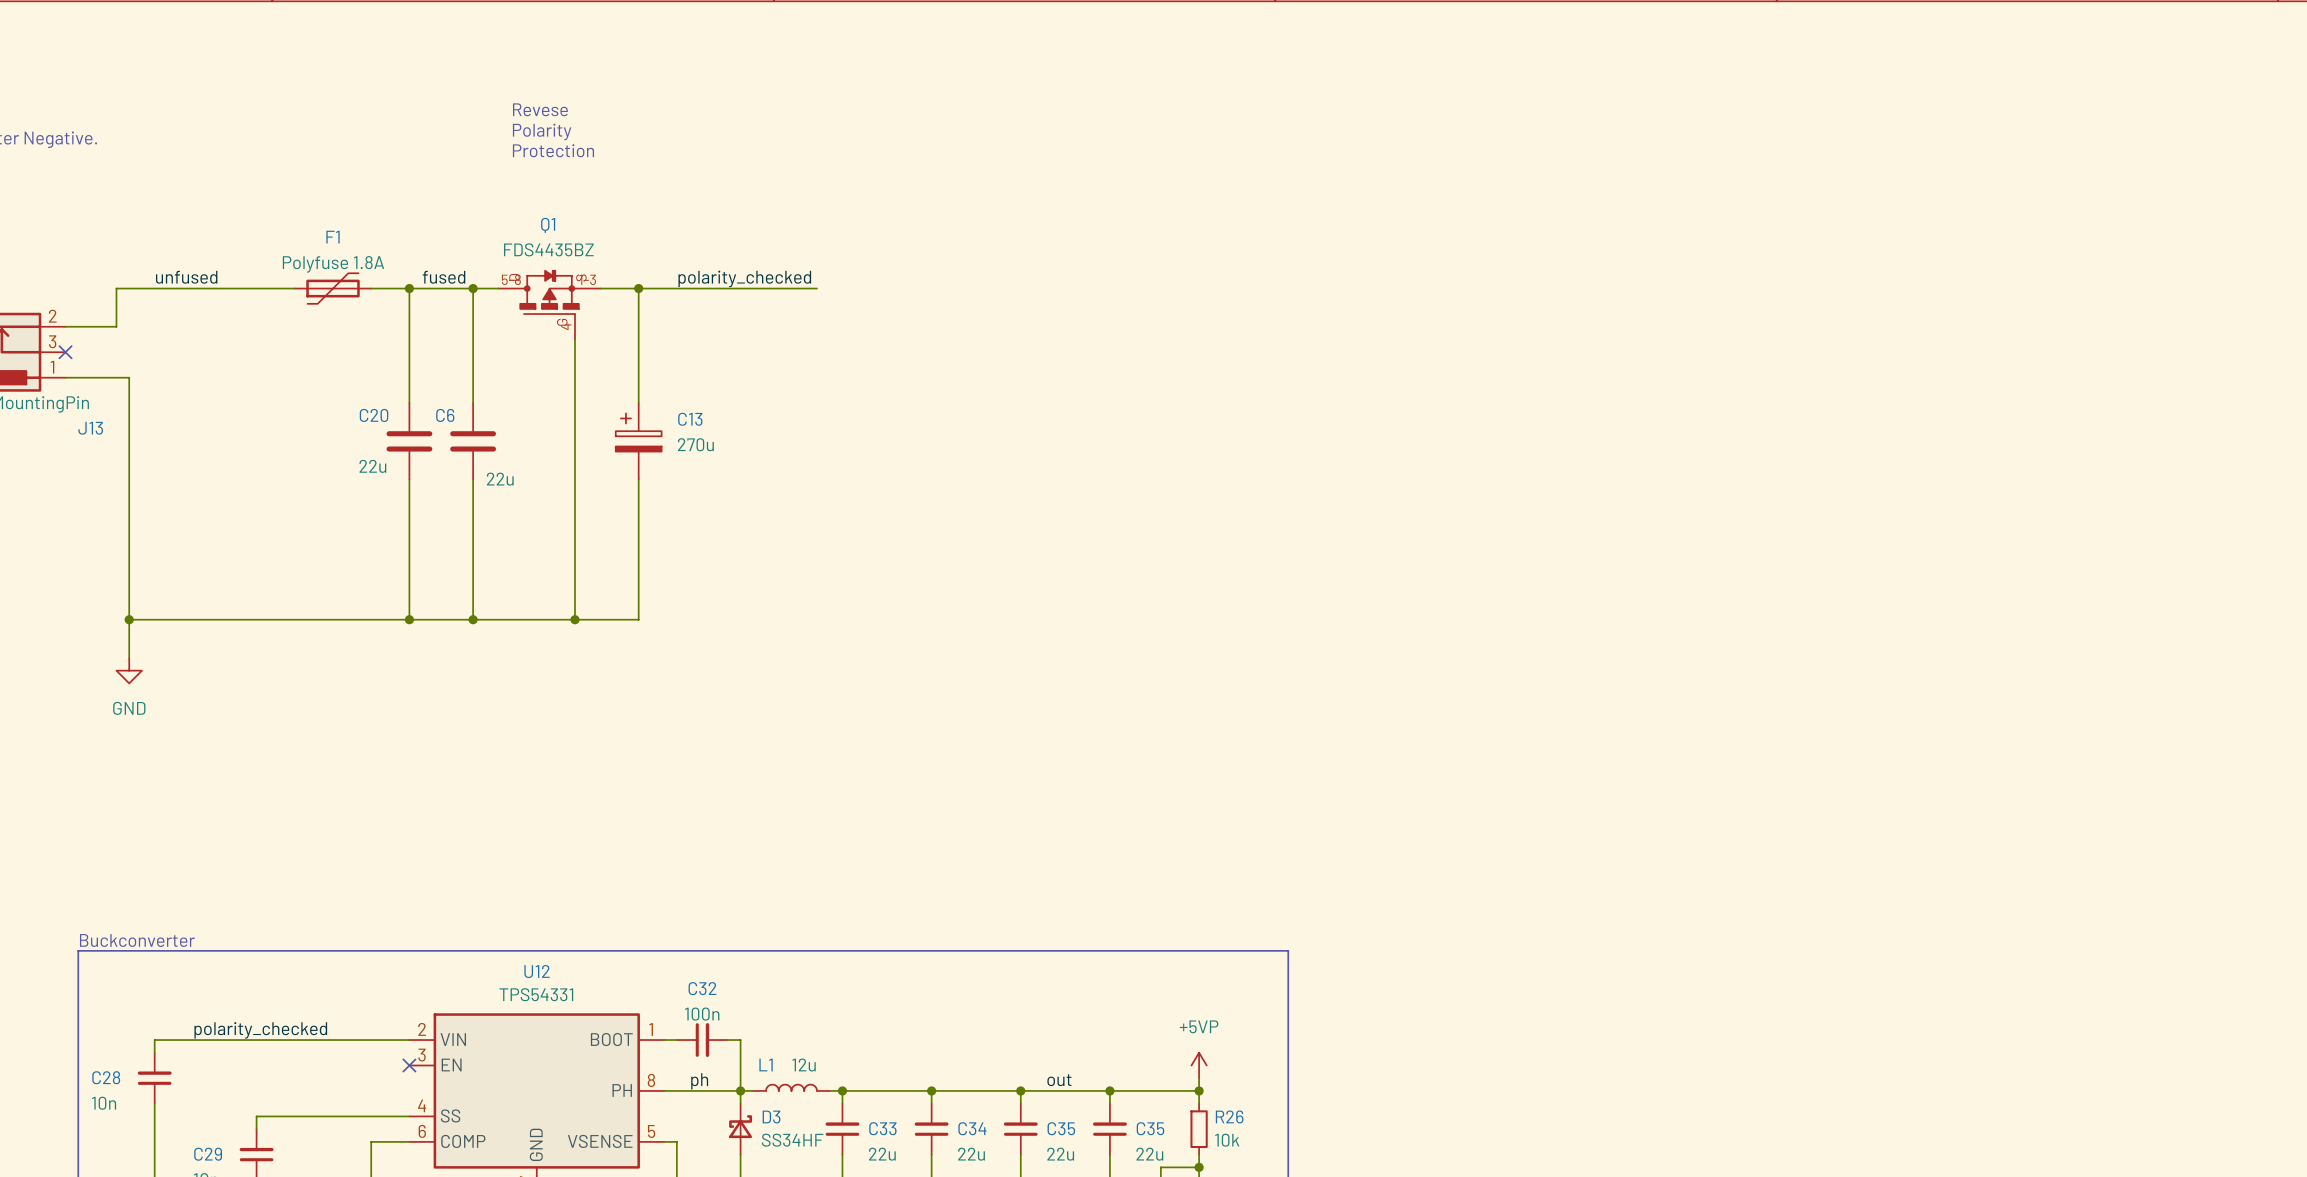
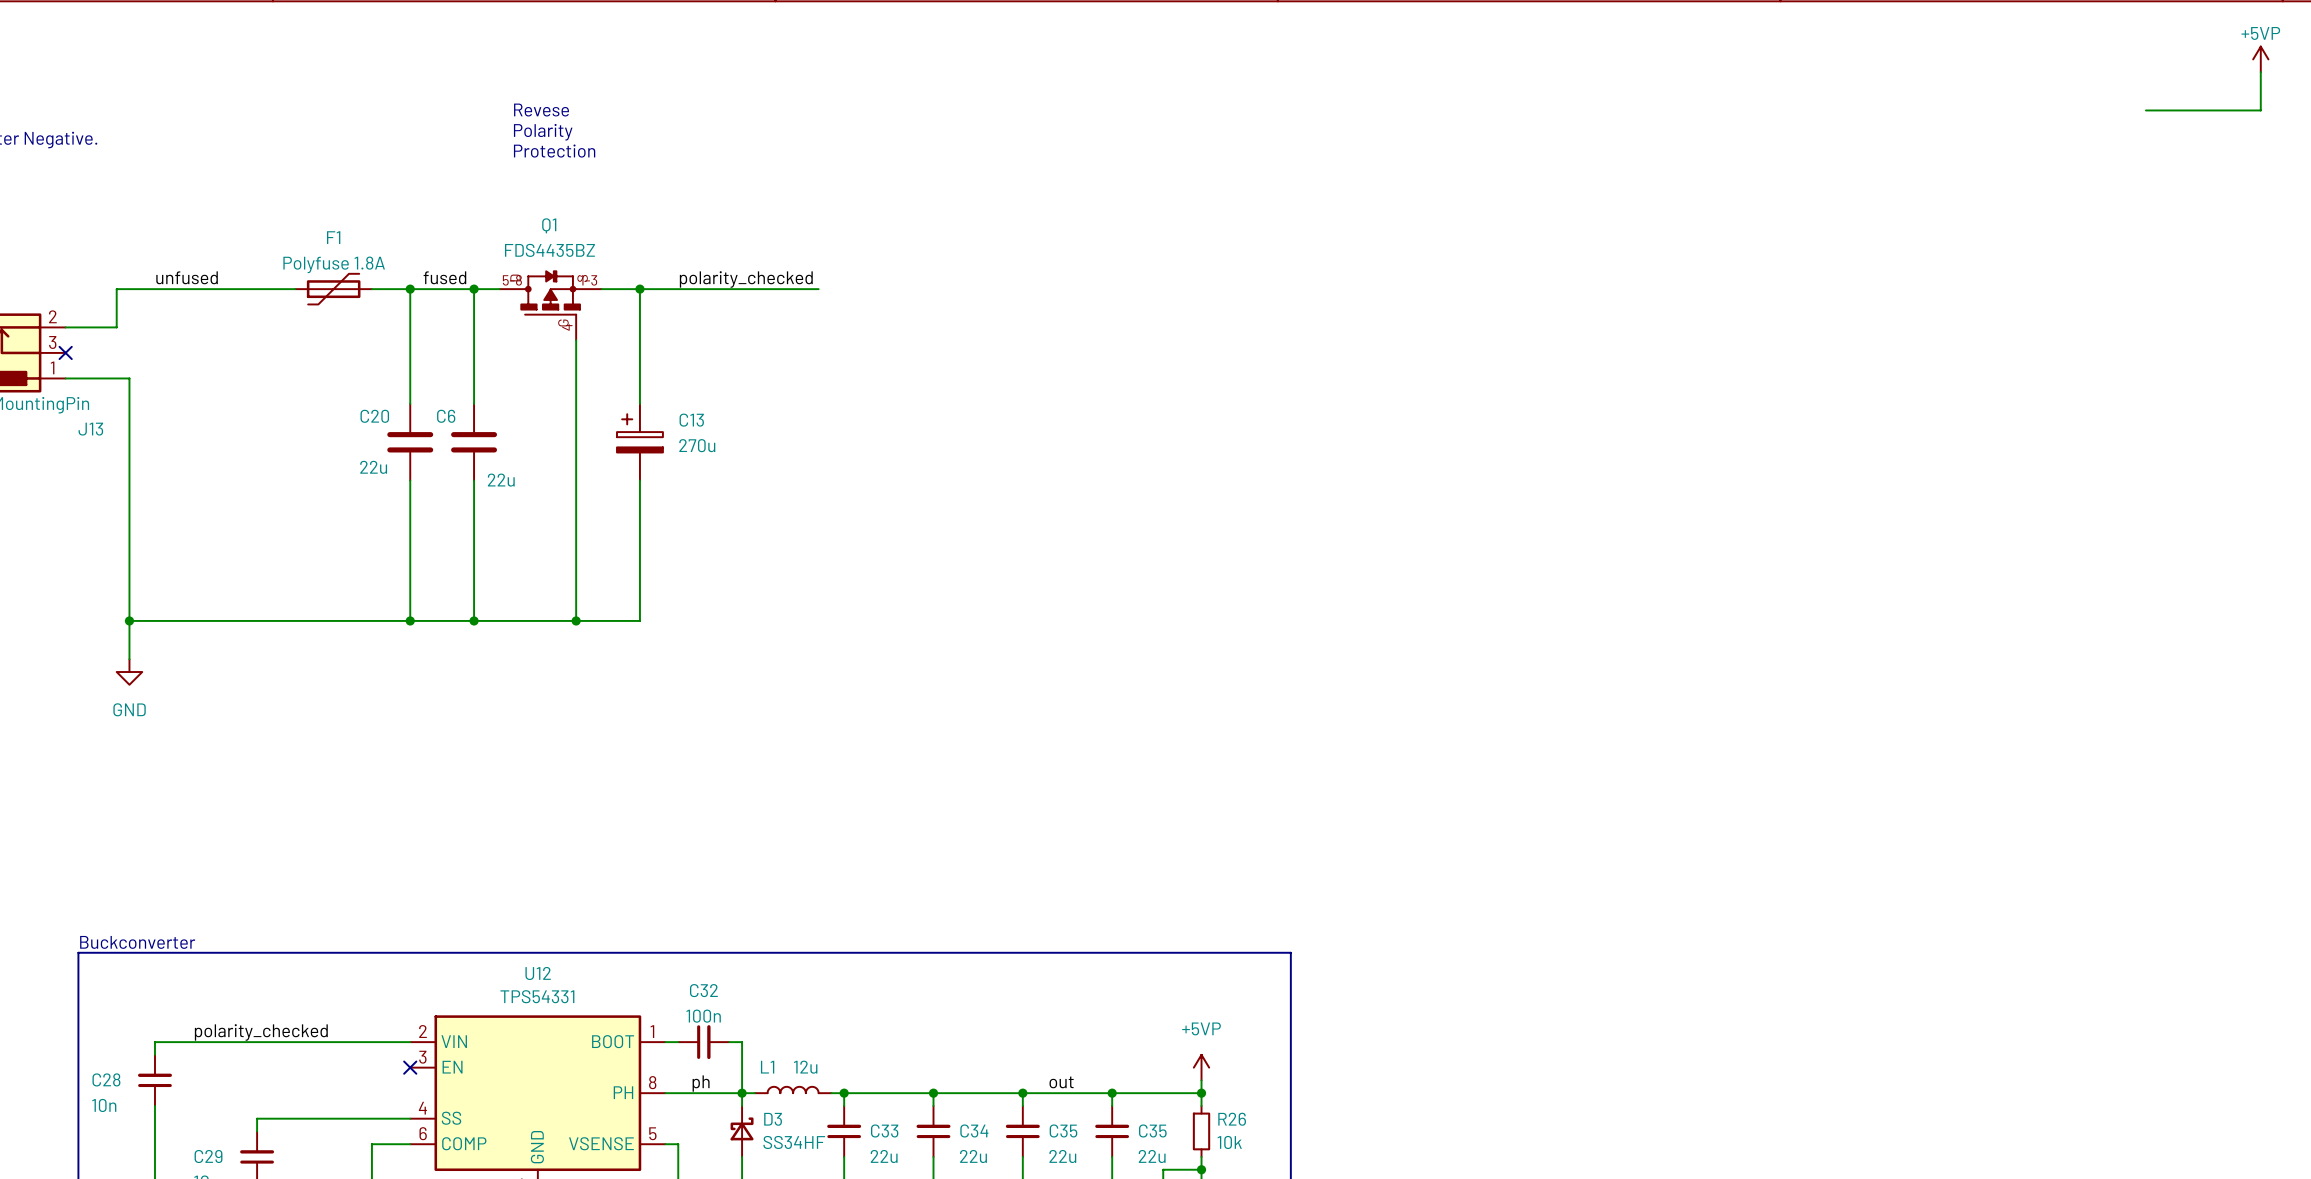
power symbol: none -> +5VP (2260, 59)
wire: none -> (2260, 72) (2260, 110) (2145, 110)

